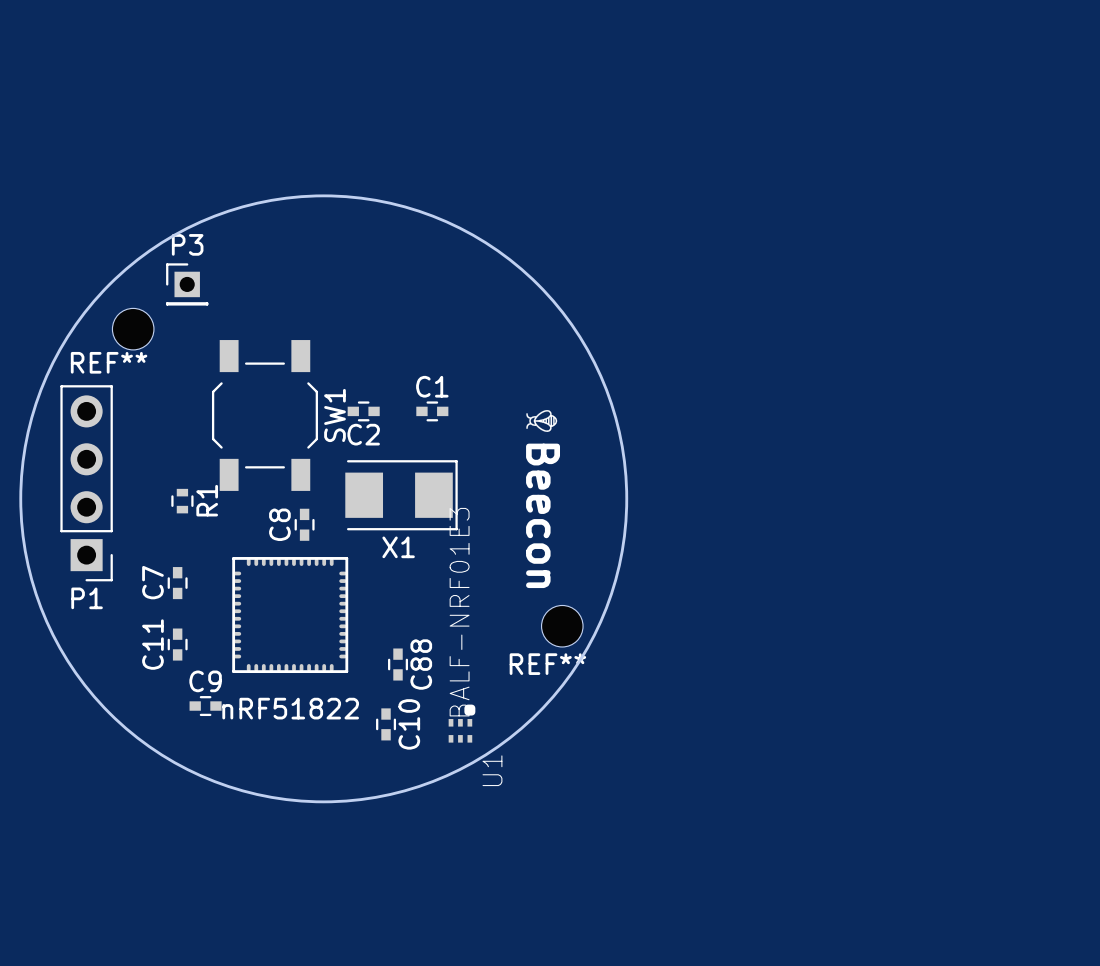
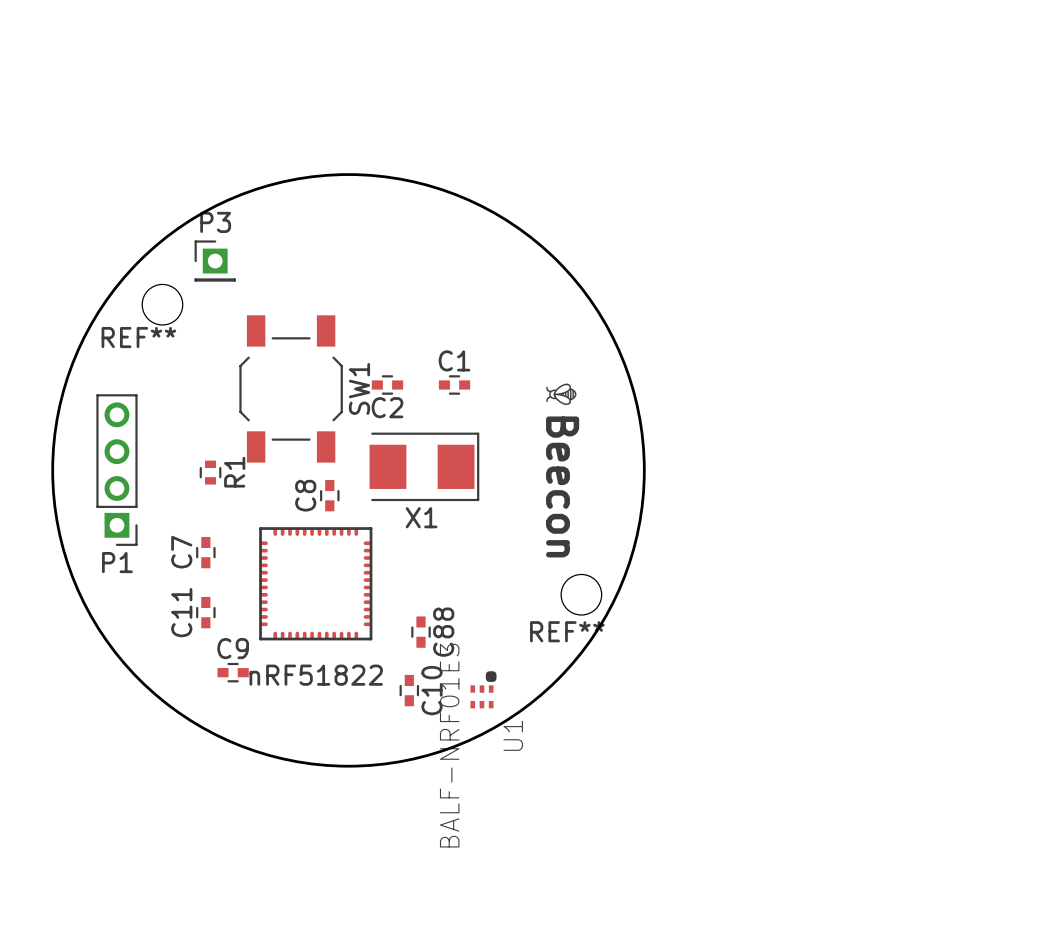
P1 footprint: [60, 385, 113, 582] -> [96, 394, 138, 546]
U1 value position: BALF-NRF01E3 (459, 612) -> BALF-NRF01E3 (449, 745)

